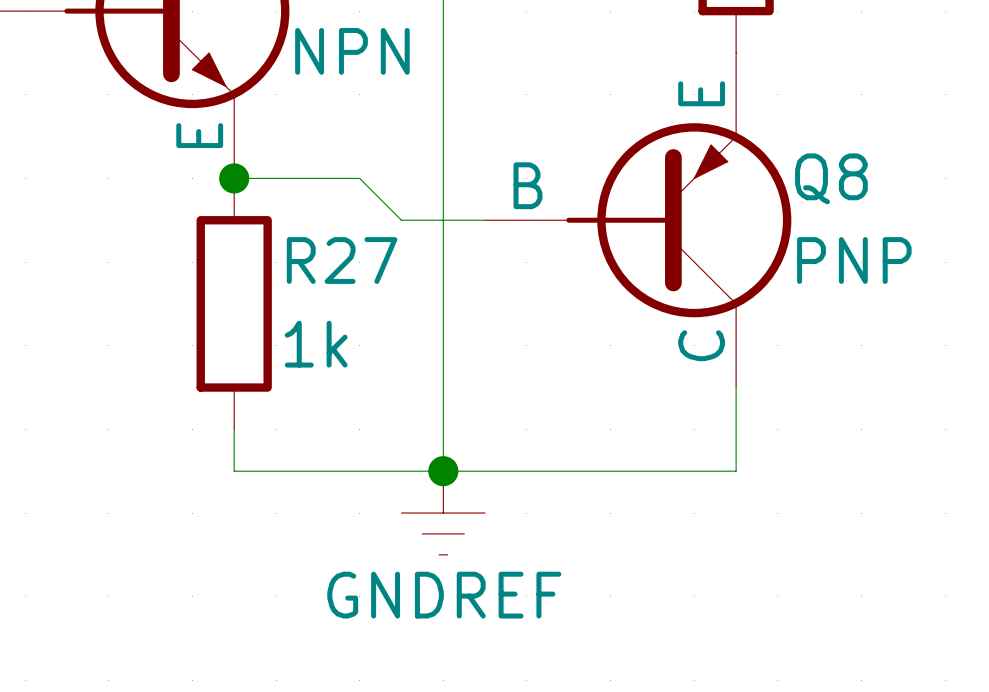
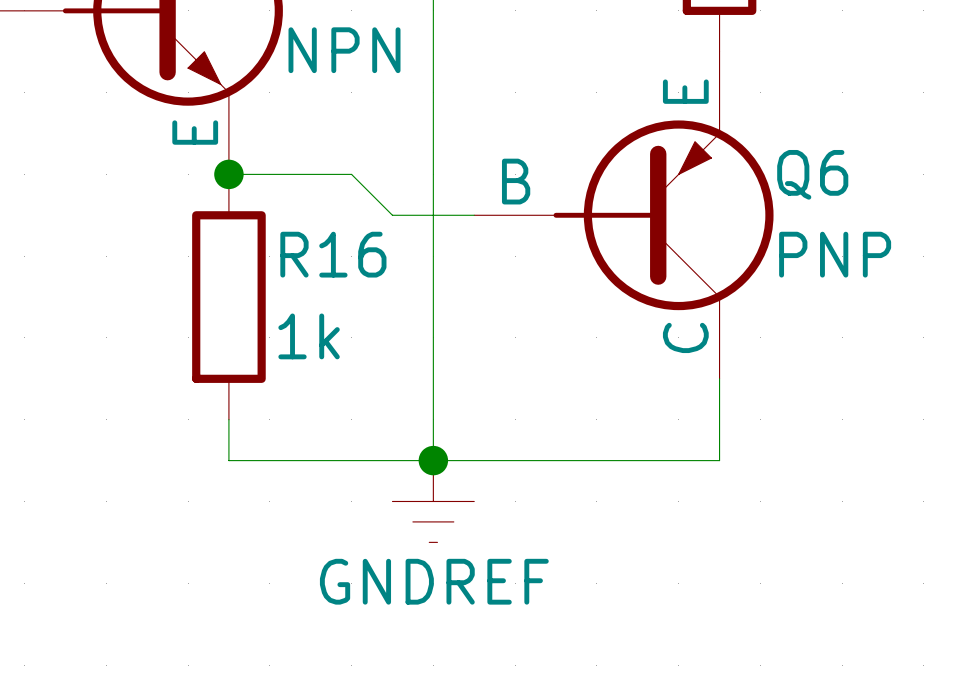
Q8 name: Q8 (831, 178) -> Q6 (812, 174)
R27 name: R27 (342, 260) -> R16 (333, 254)

